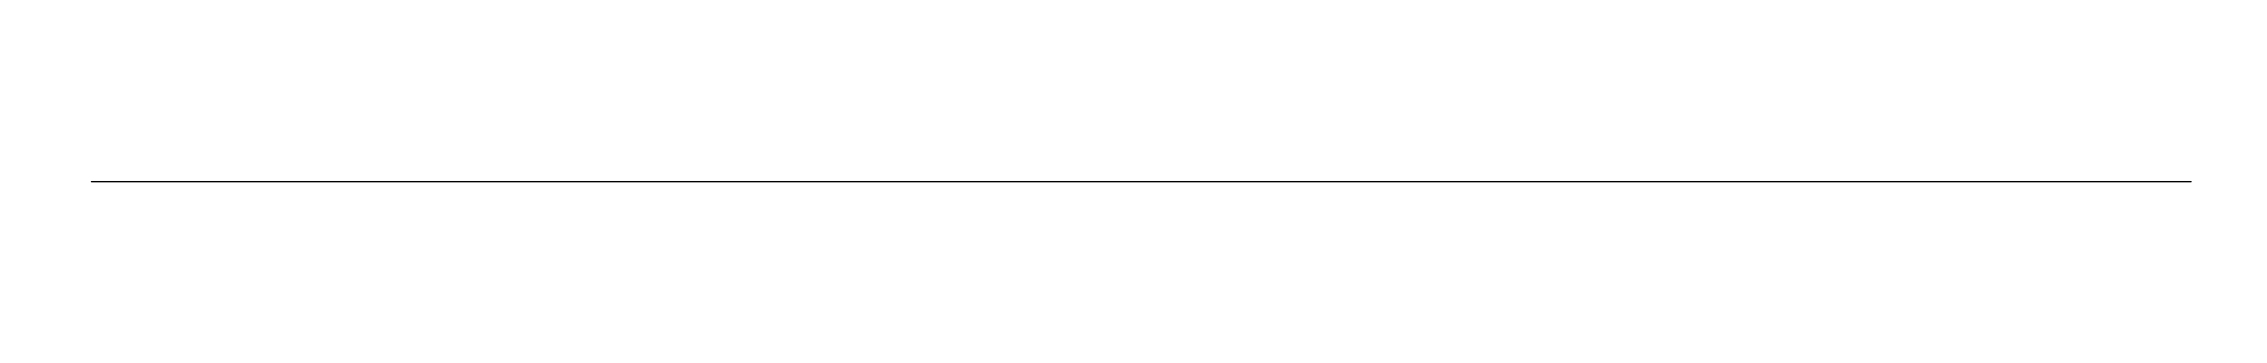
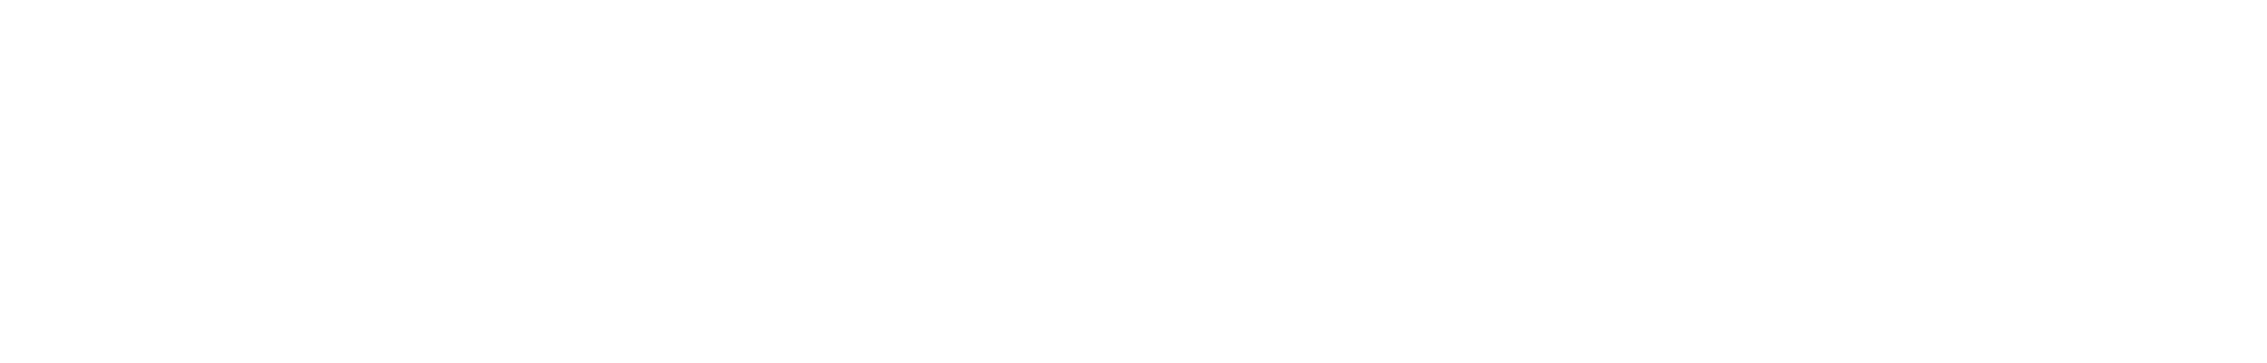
wire: (91, 181) (2191, 181) -> none

